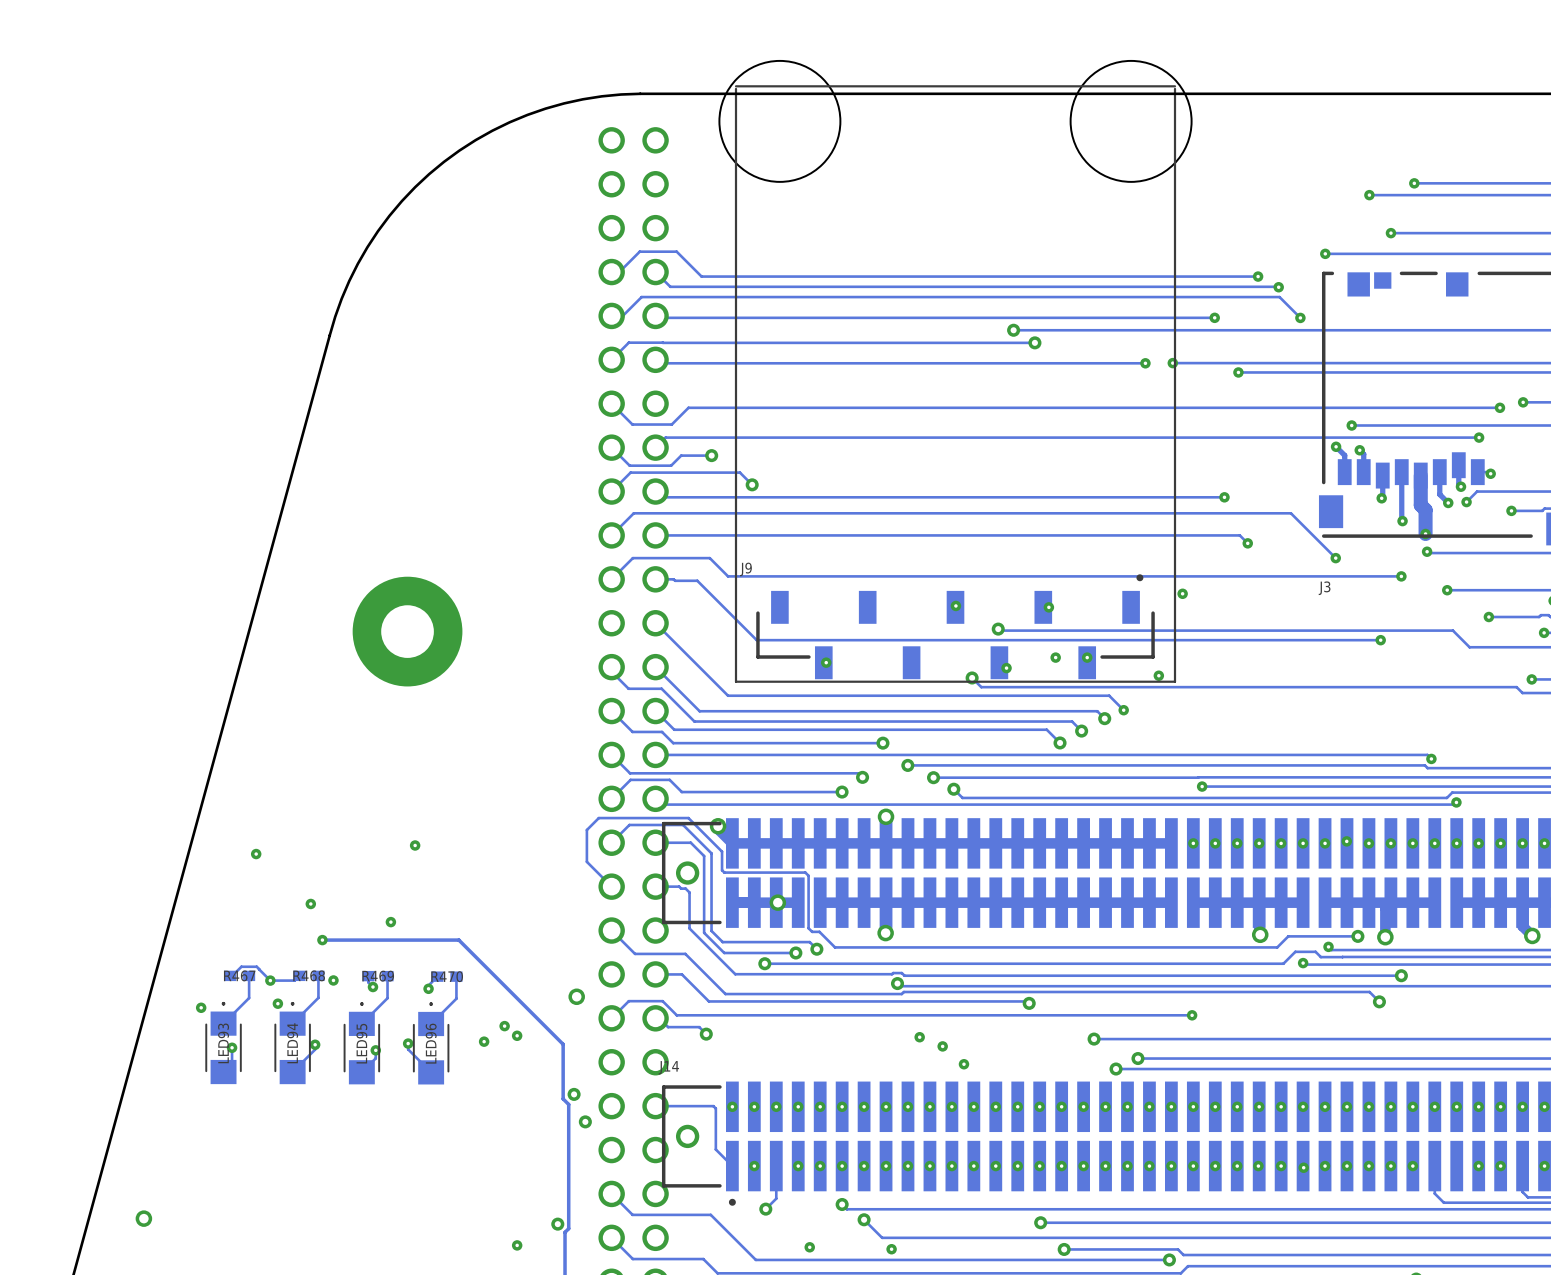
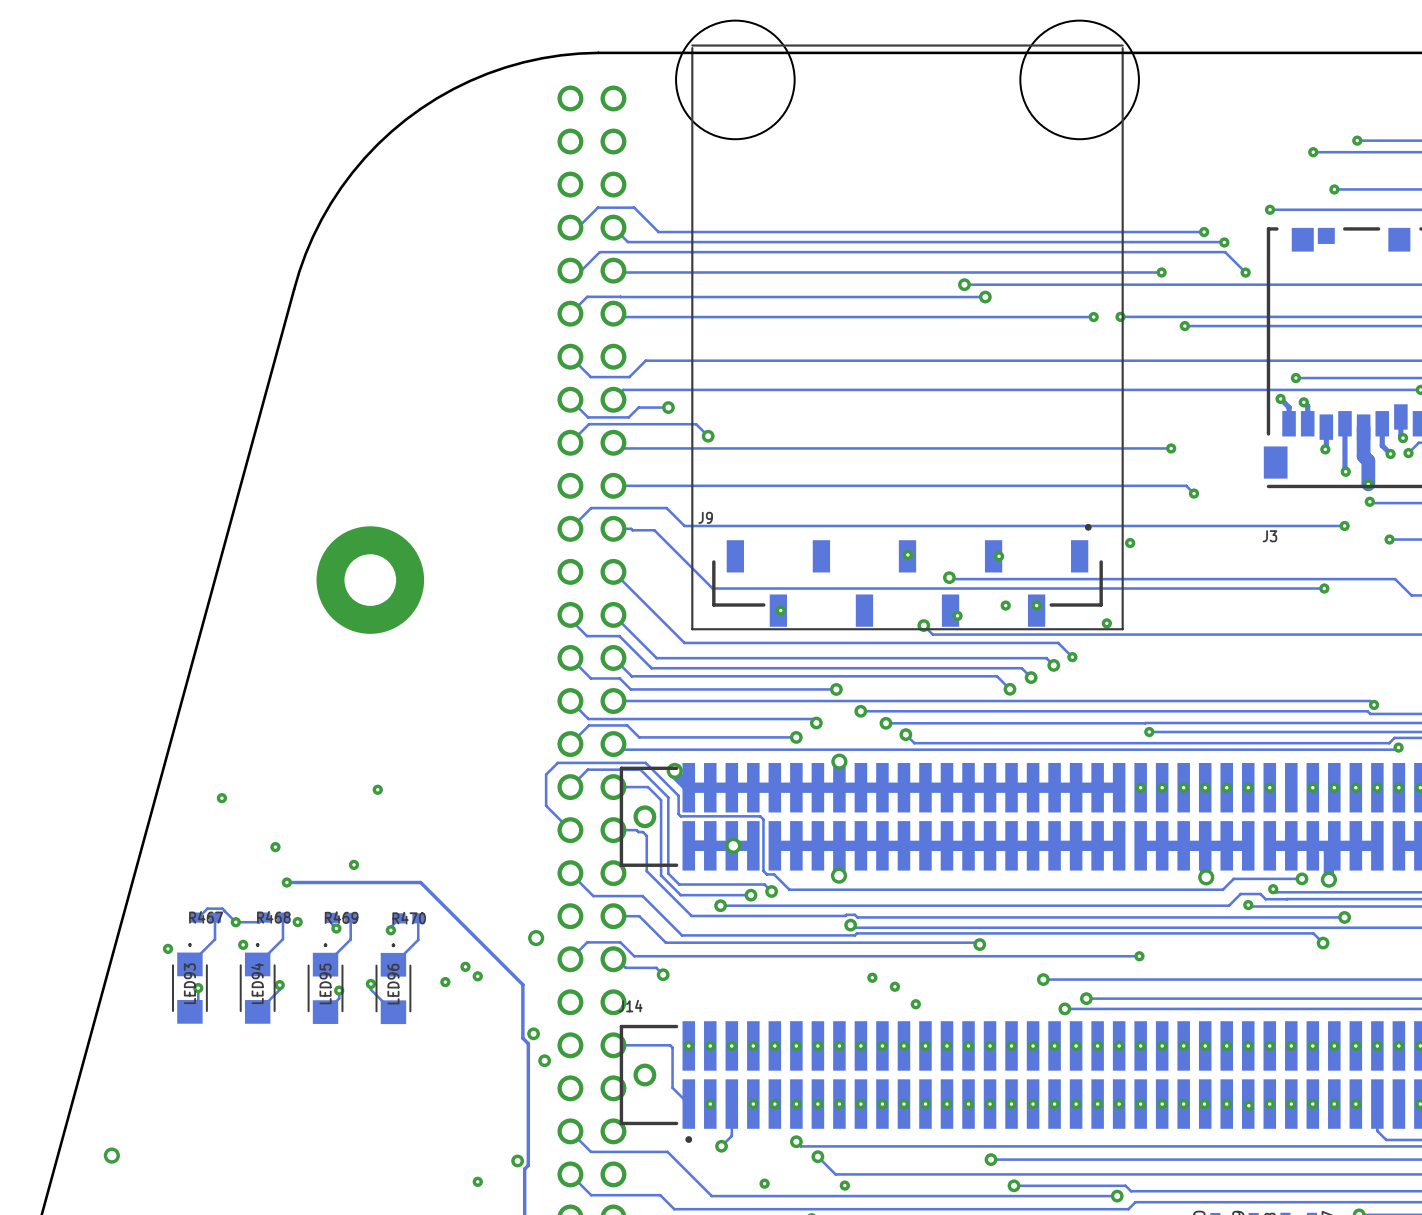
track: (611, 535) (633, 513) (1290, 513) (1335, 558) -> none
via: (1335, 558) -> none
via: (1346, 841) -> none

